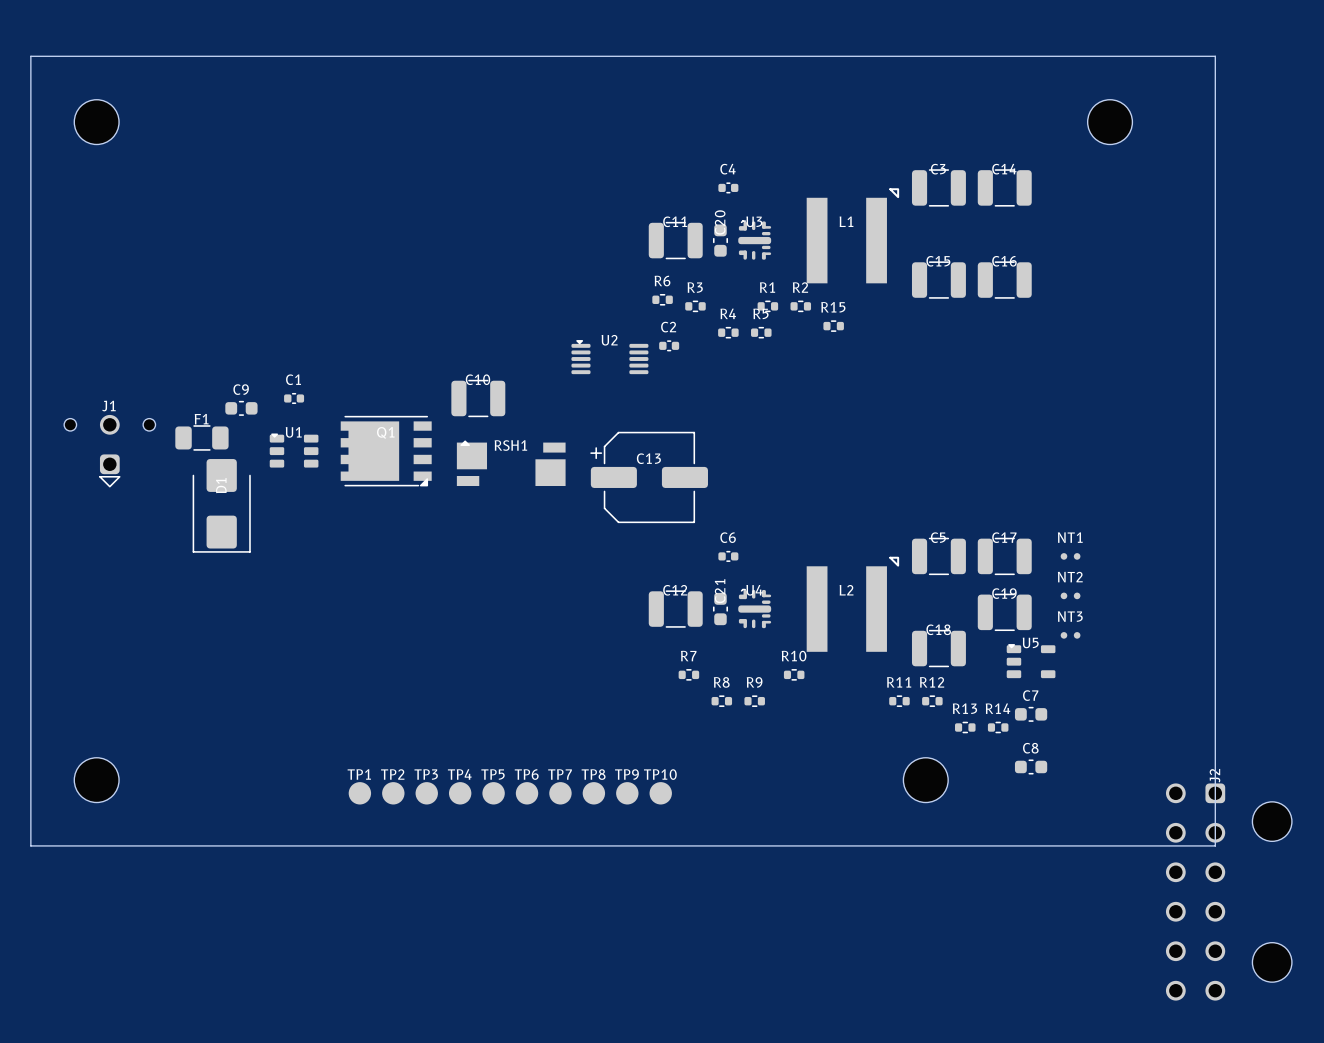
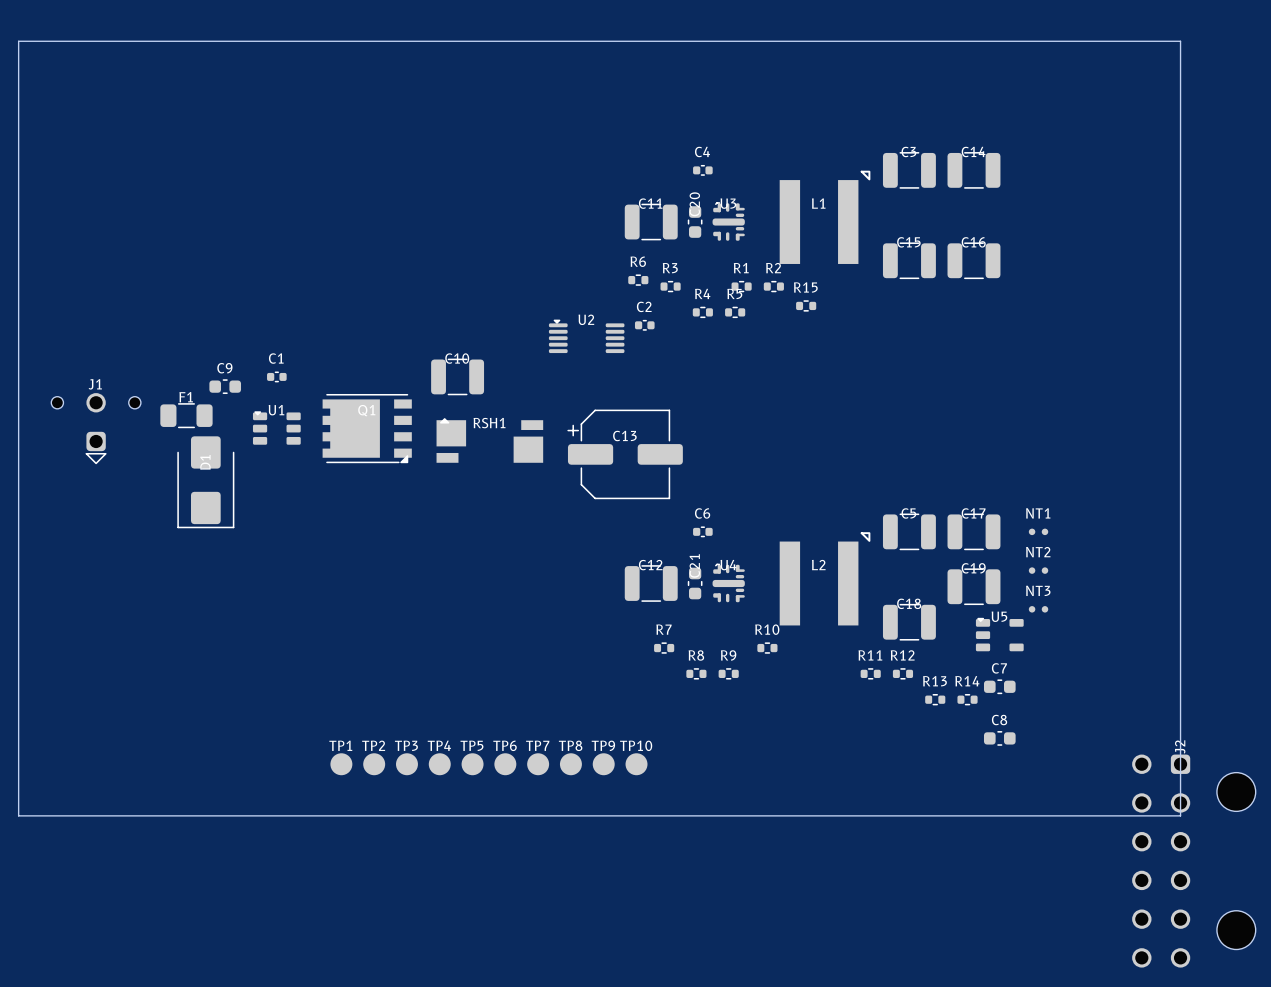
part: (96, 122) -> none
part: (1110, 122) -> none
part: (96, 780) -> none
part: (925, 780) -> none

